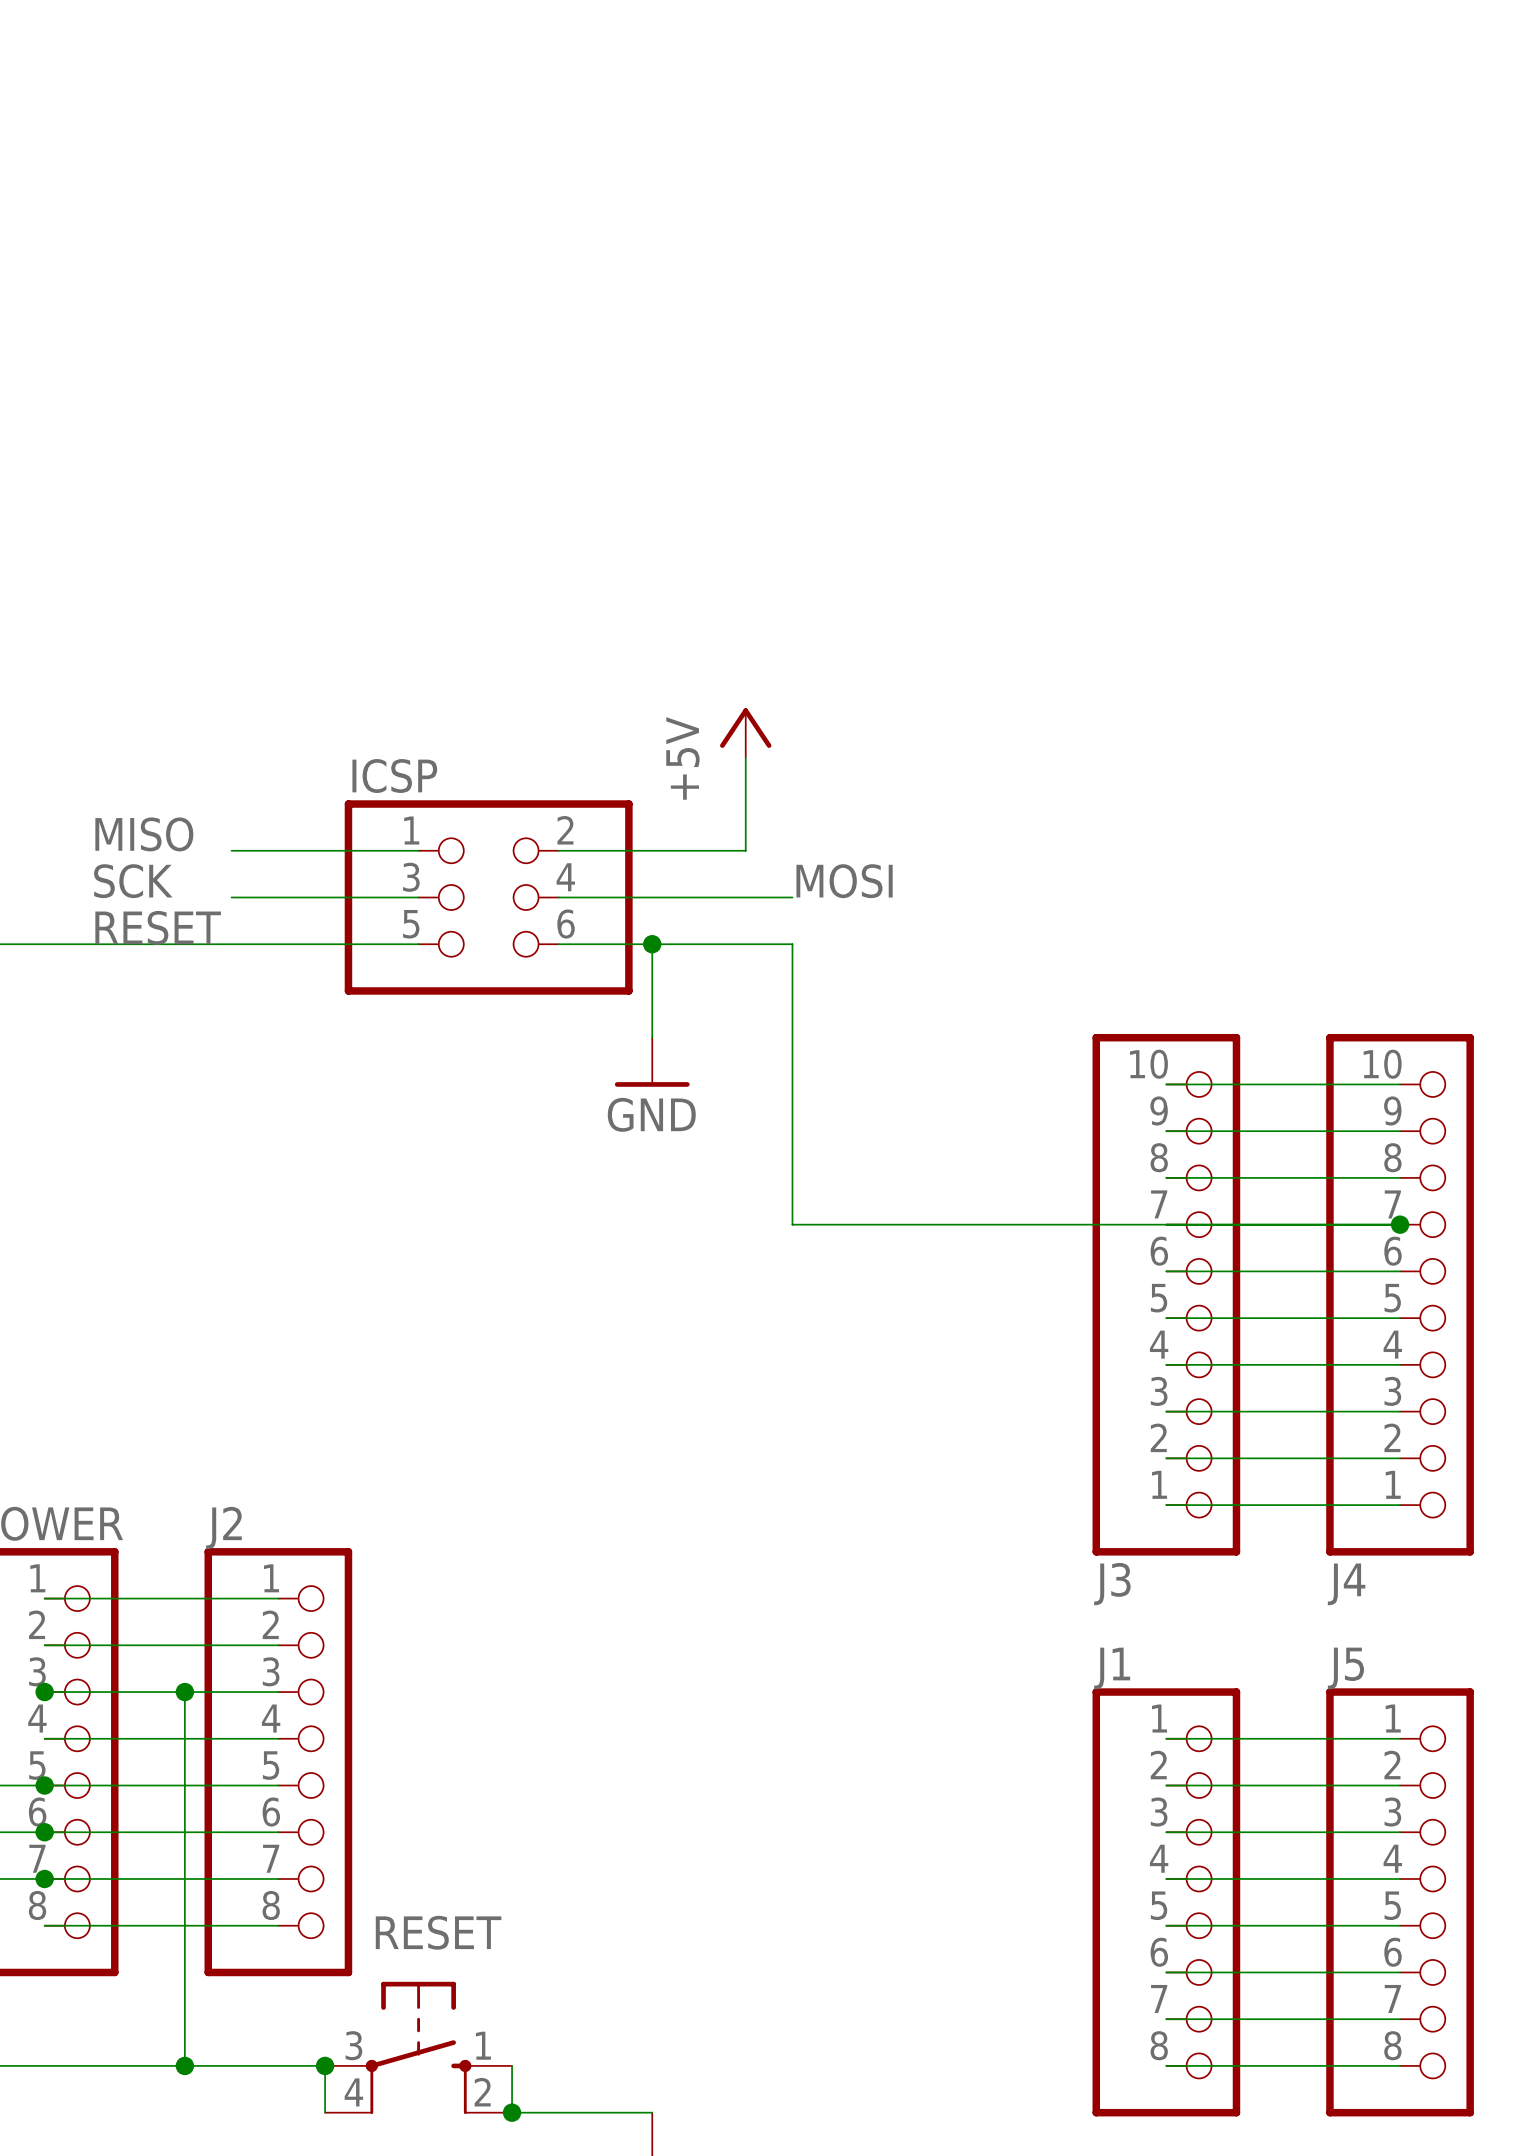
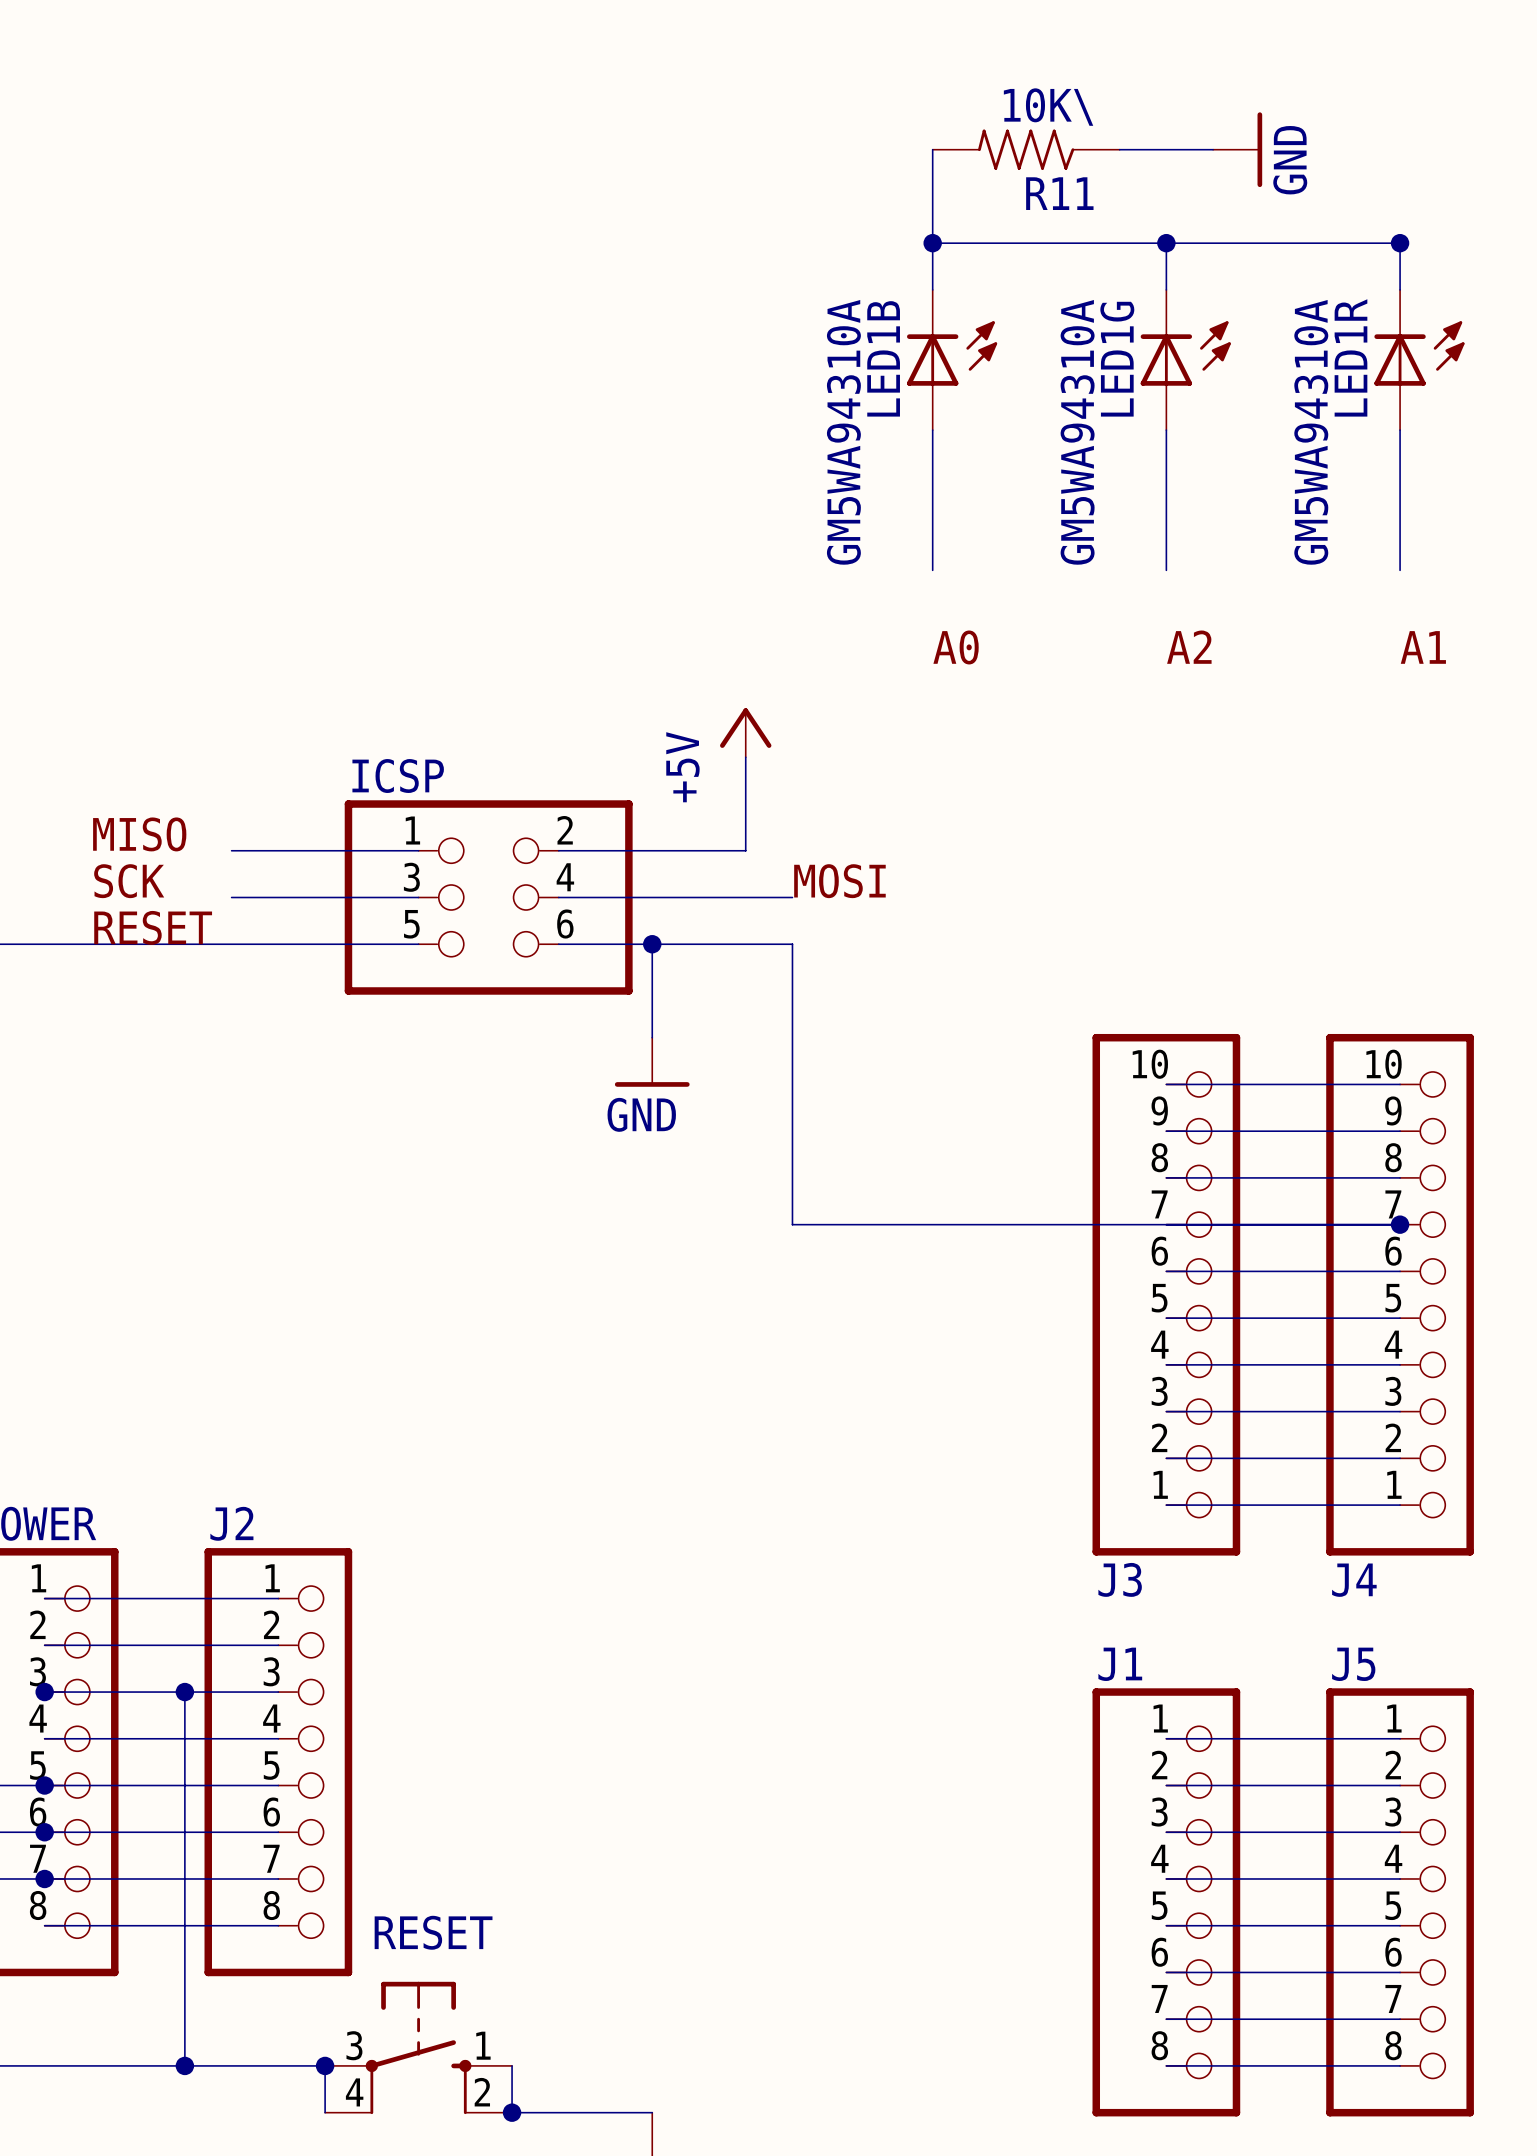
wire: none -> (932, 149) (932, 289)
R11: none -> 10K\ (1026, 149)
wire: none -> (1119, 149) (1213, 149)
power symbol: none -> GND (1237, 149)
wire: none -> (932, 243) (1400, 243) (1400, 289)
junction: none -> (932, 243)
wire: none -> (1166, 243) (1166, 289)
junction: none -> (1166, 243)
junction: none -> (1400, 243)
LED1B: none -> GM5WA94310A (952, 360)
LED1G: none -> GM5WA94310A (1185, 360)
LED1R: none -> GM5WA94310A (1419, 360)
wire: none -> (932, 430) (932, 570)
wire: none -> (1166, 430) (1166, 570)
wire: none -> (1400, 430) (1400, 570)
label: none -> A0 (956, 647)
label: none -> A2 (1189, 647)
label: none -> A1 (1423, 647)

